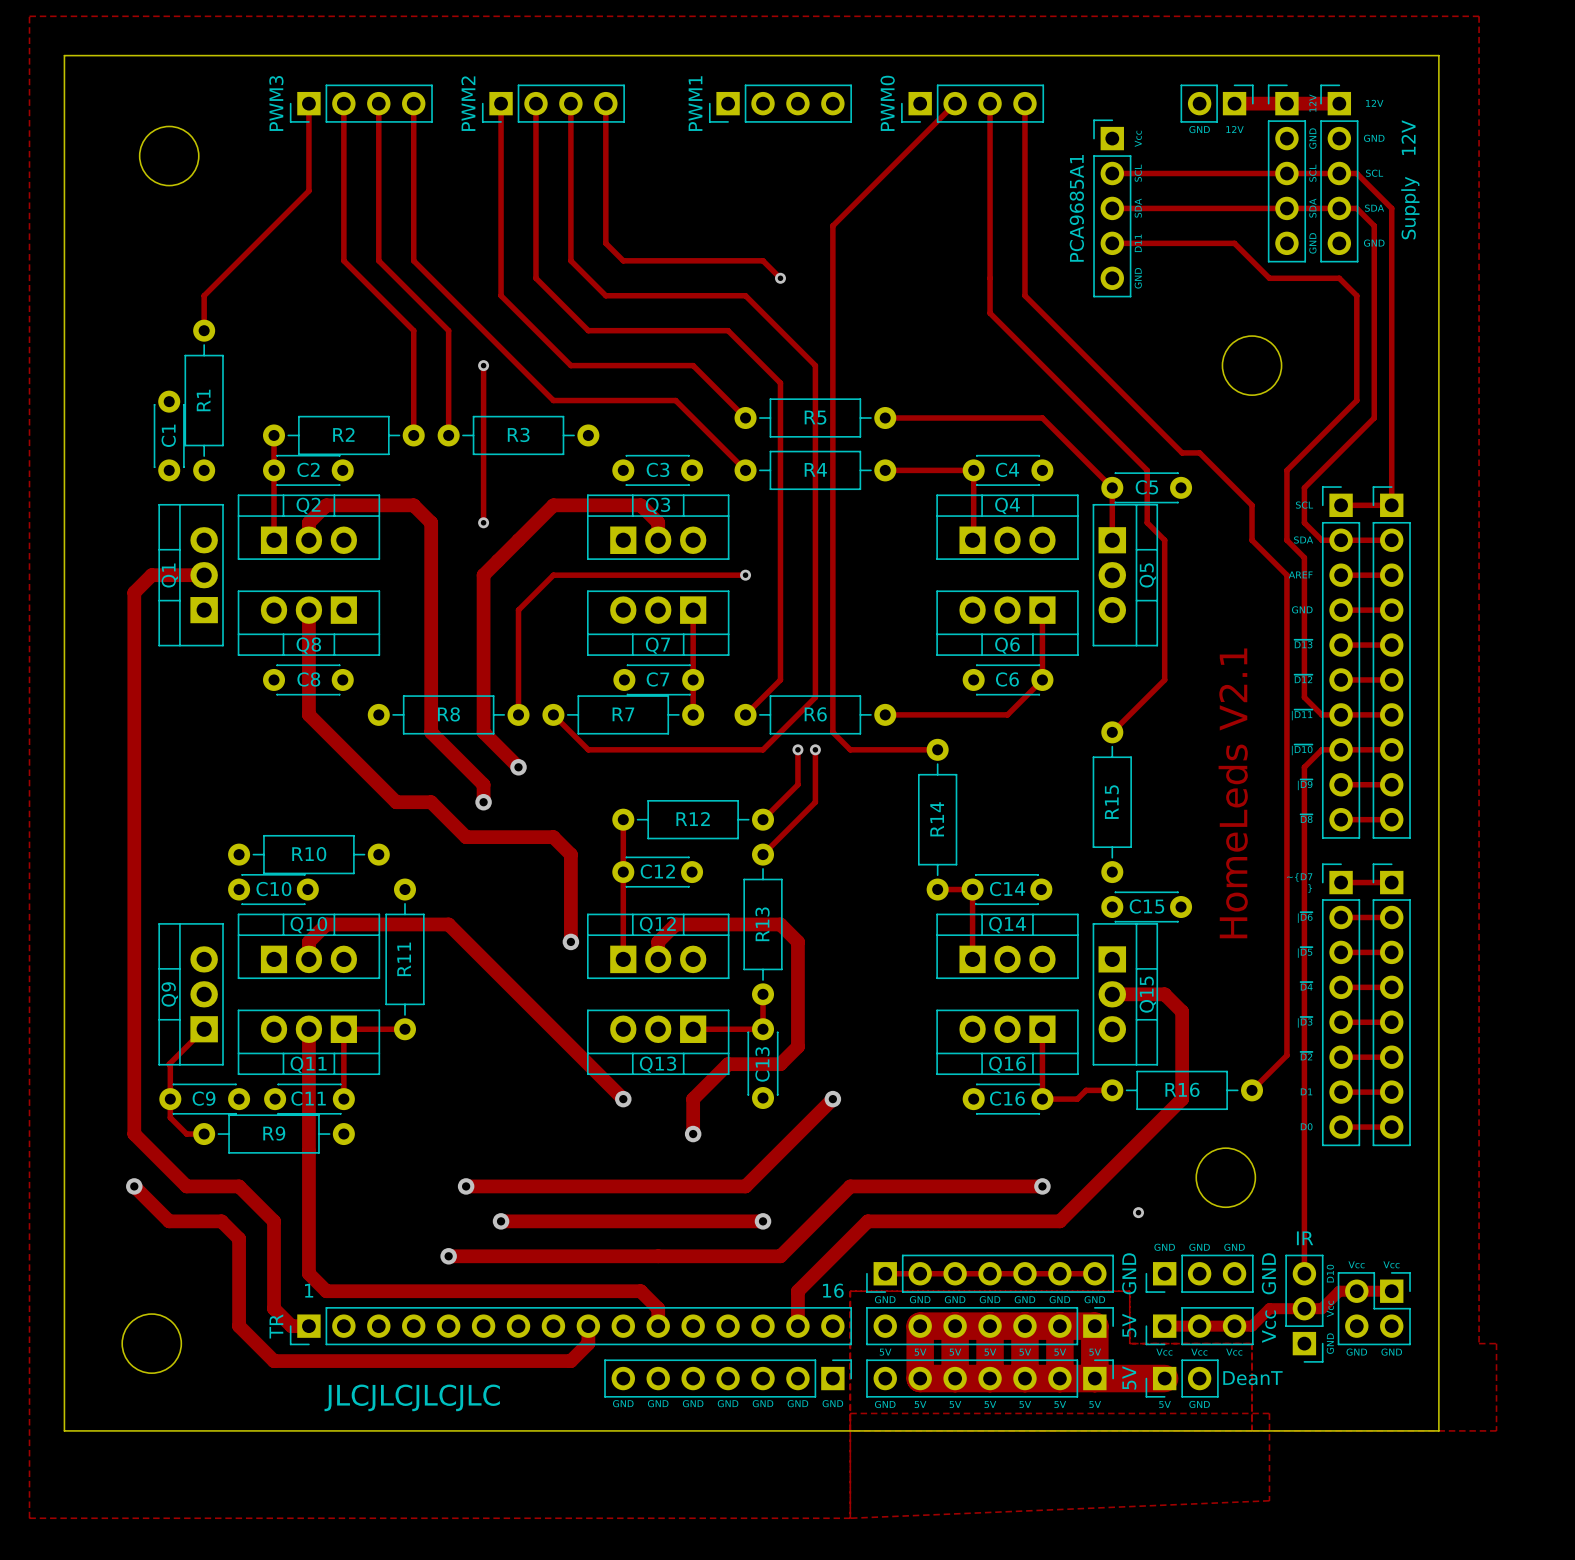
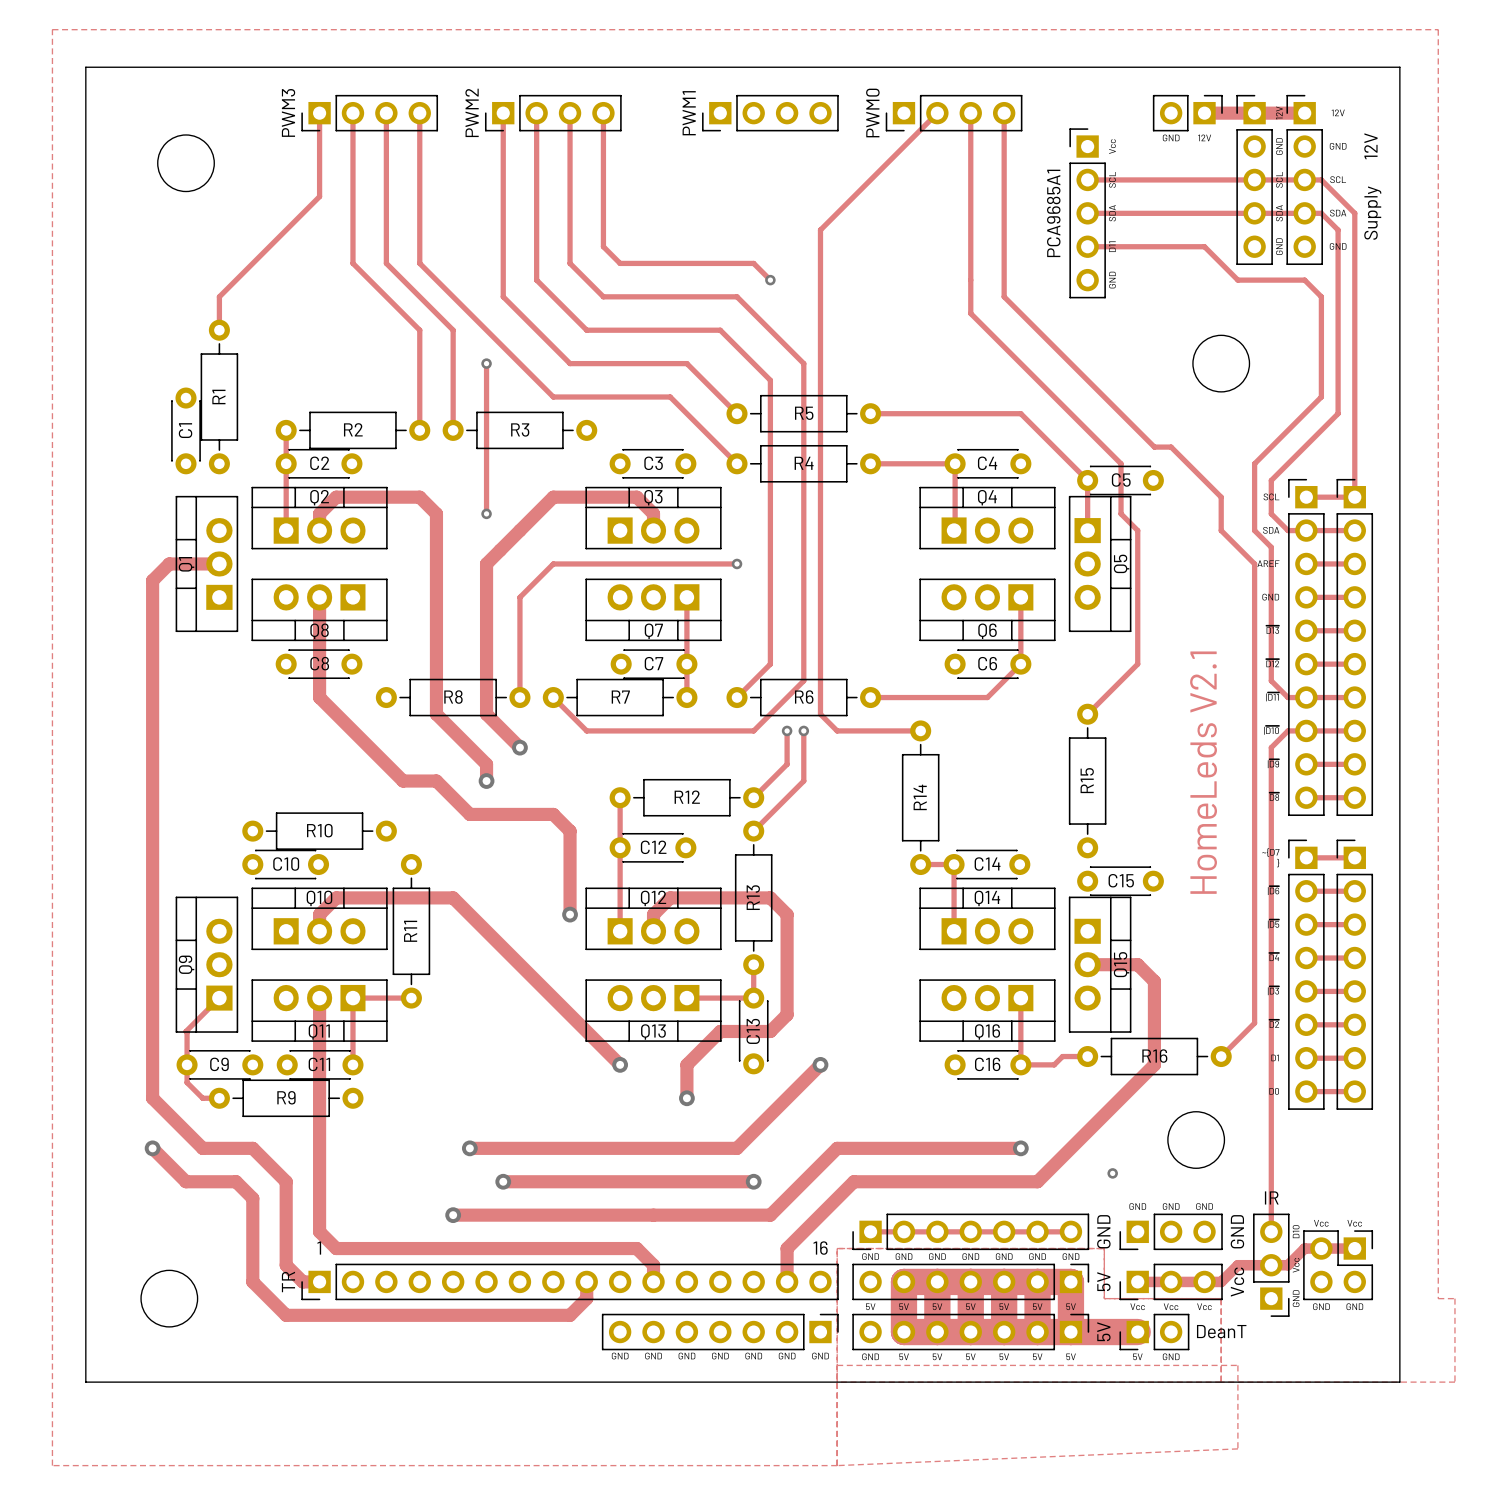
text: JLCJLCJLCJLC (412, 1397) -> none

